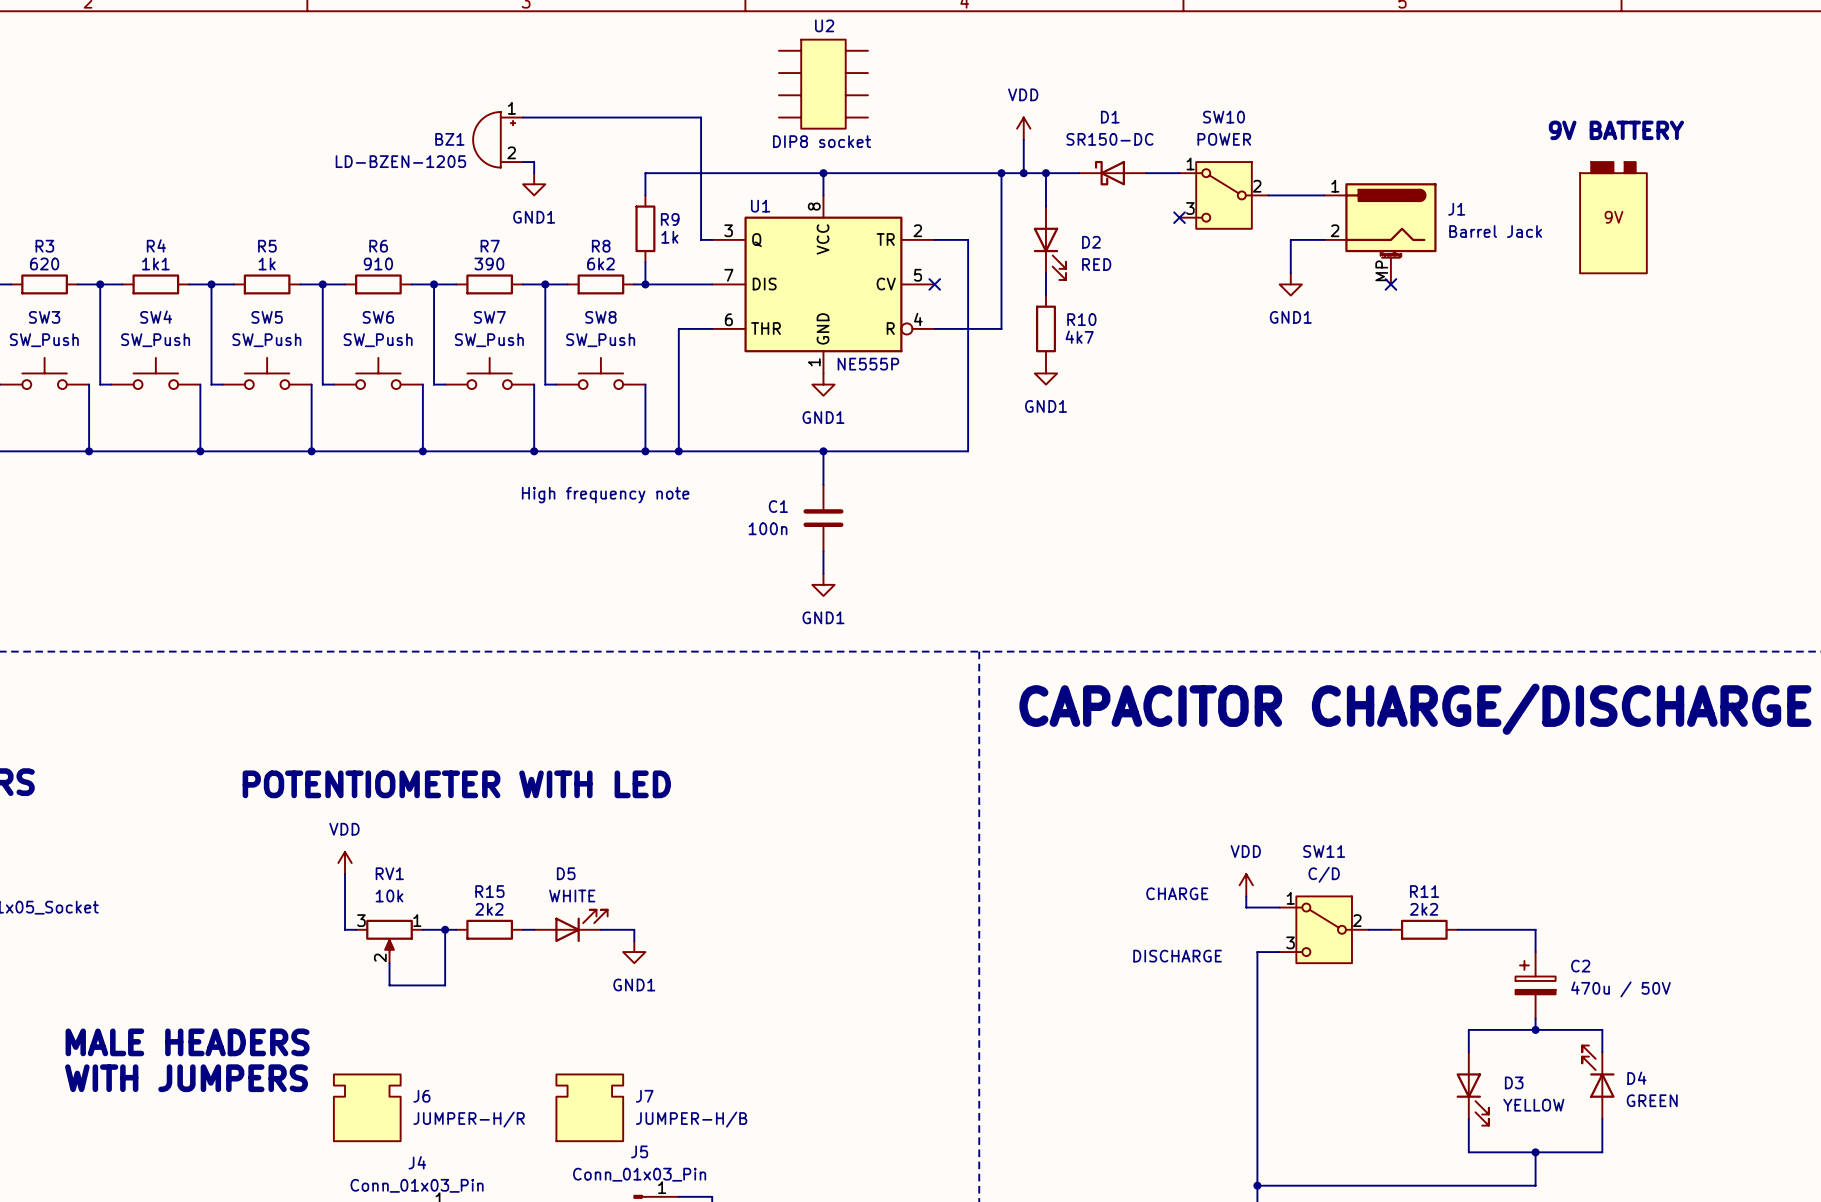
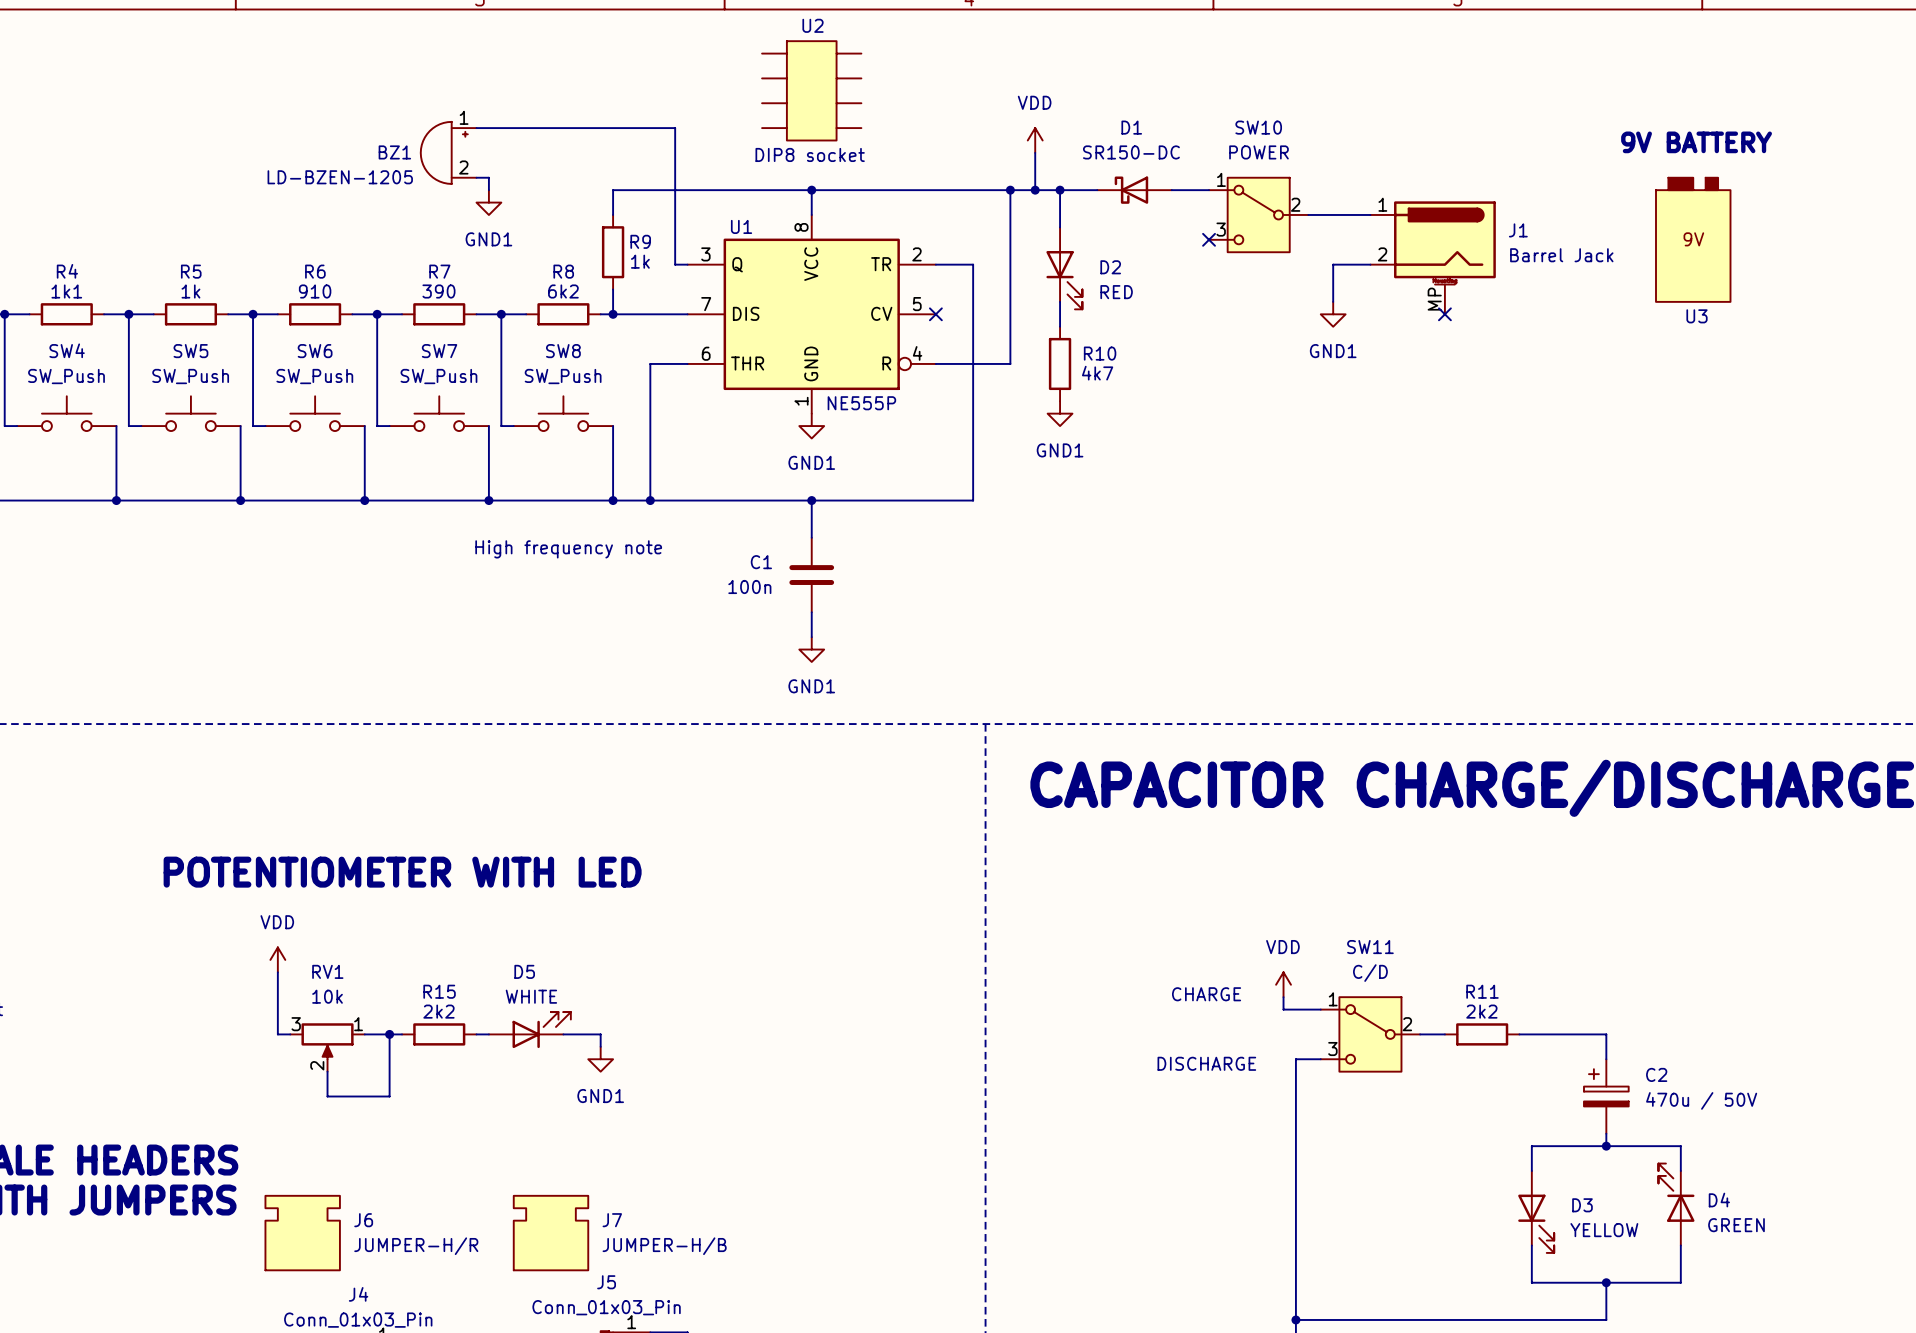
U3 name: none -> U3 (1697, 316)

